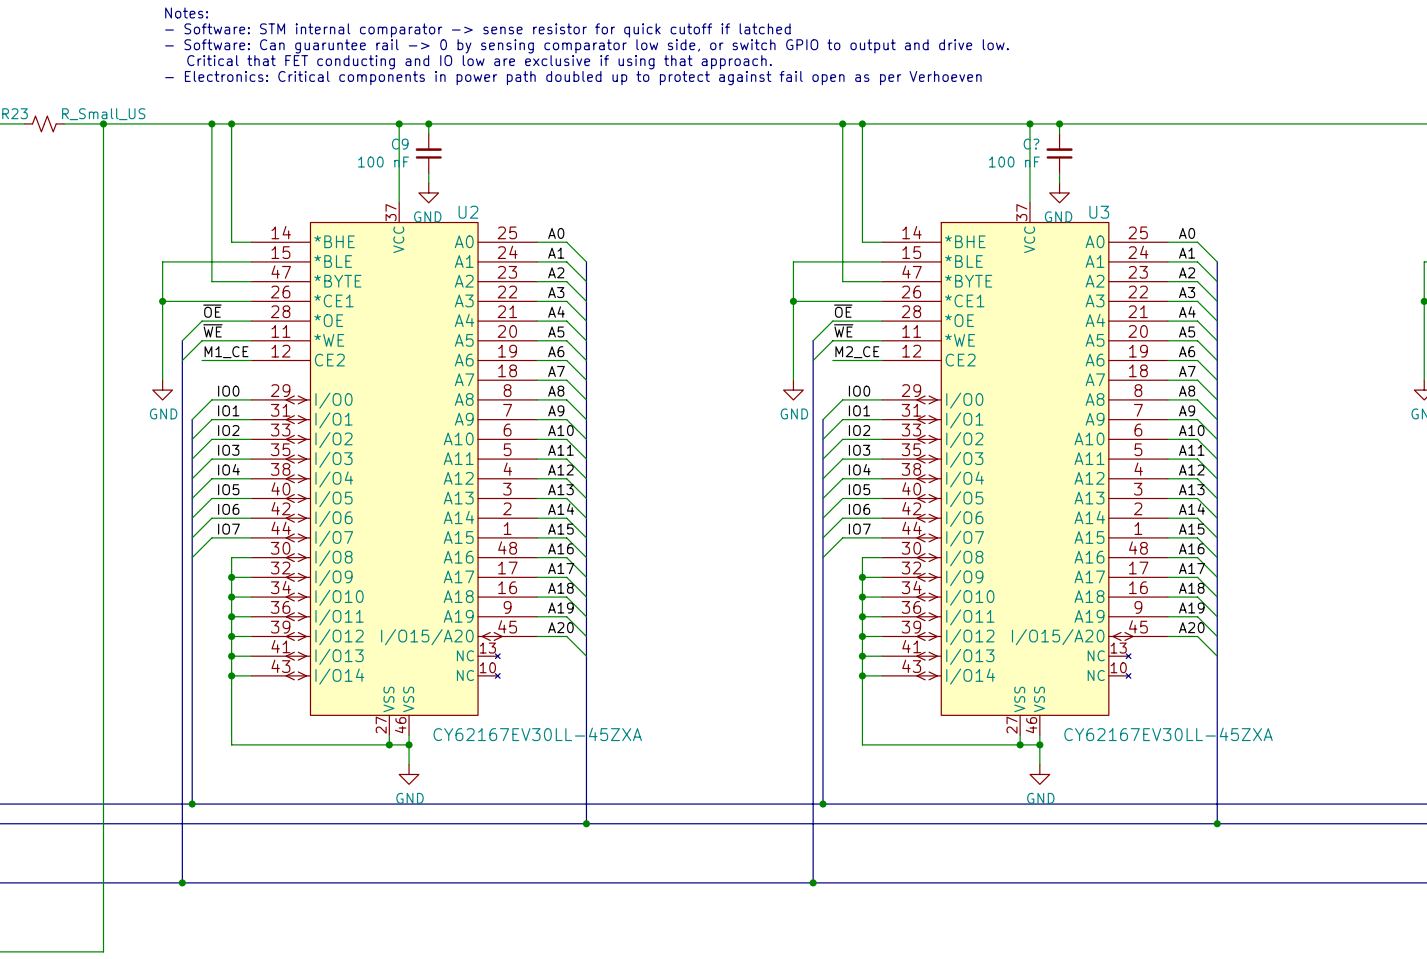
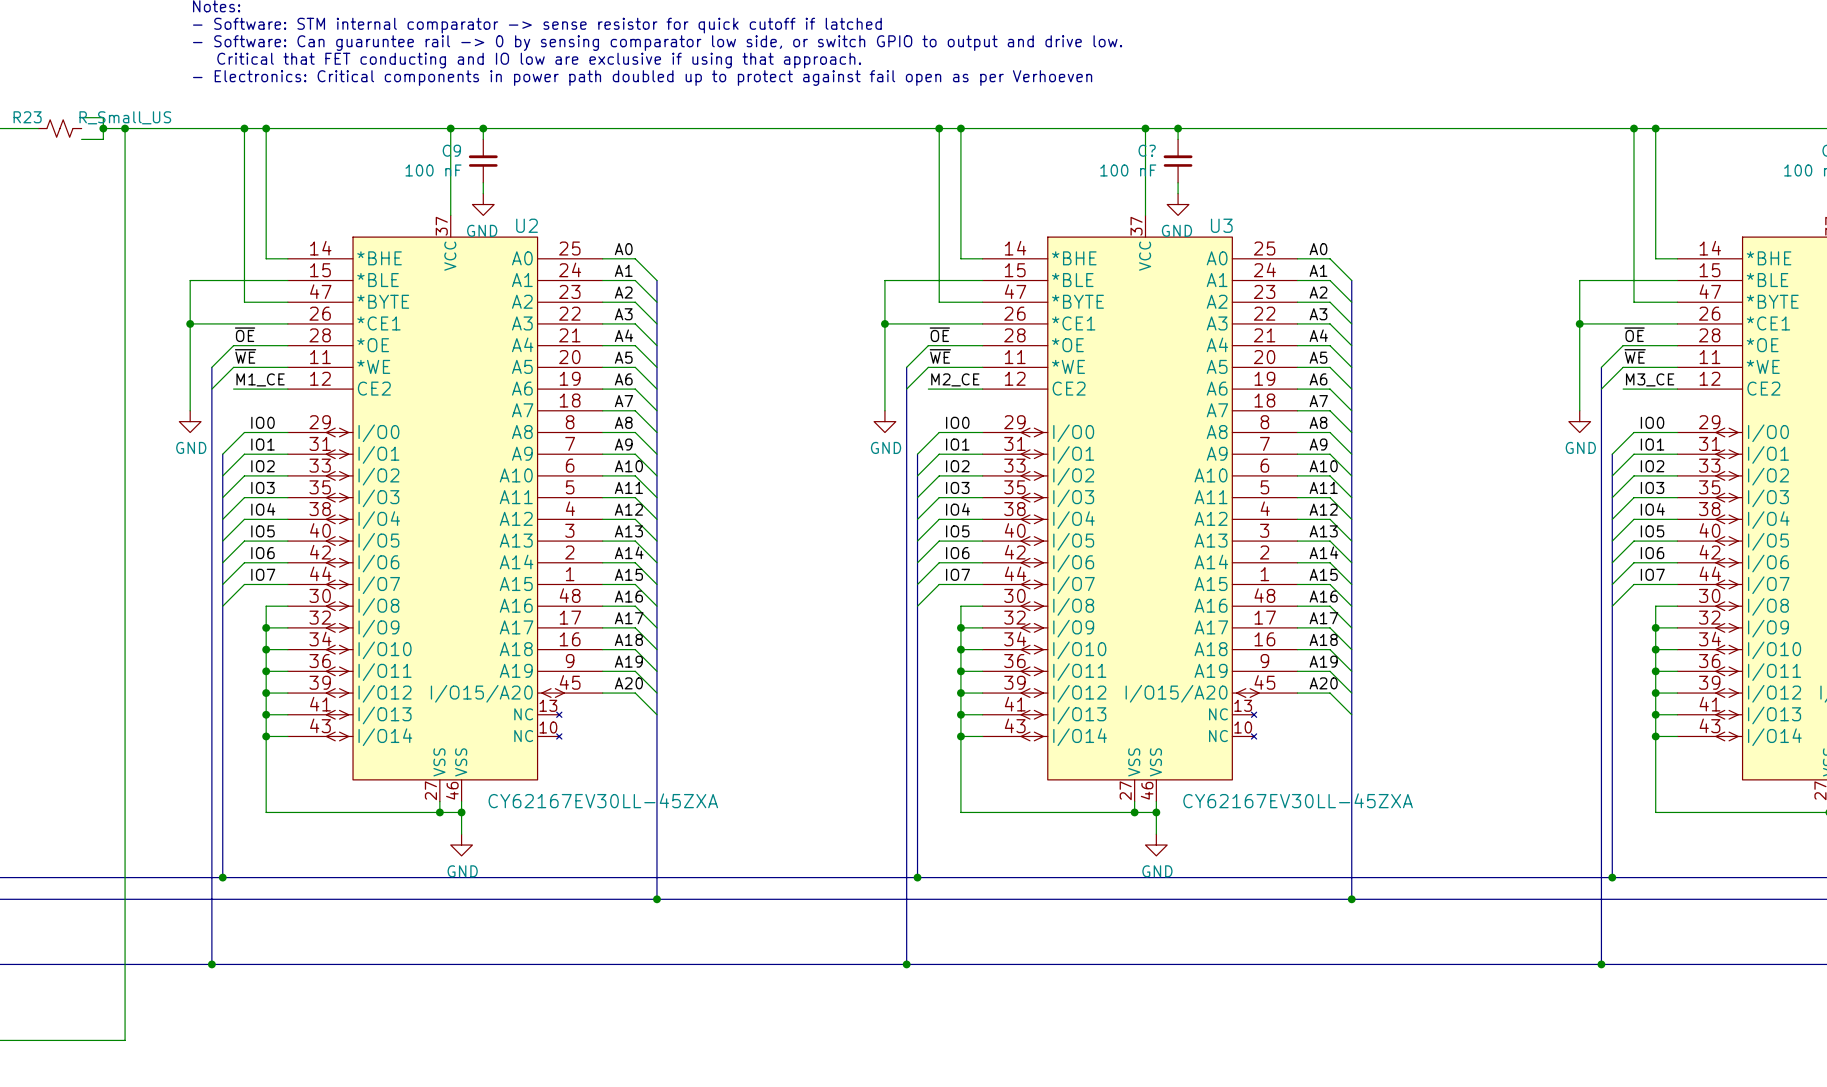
wire: none -> (81, 117) (103, 117) (103, 139) (81, 139)
wire: (64, 123) (83, 123) -> none
junction: none -> (103, 128)

